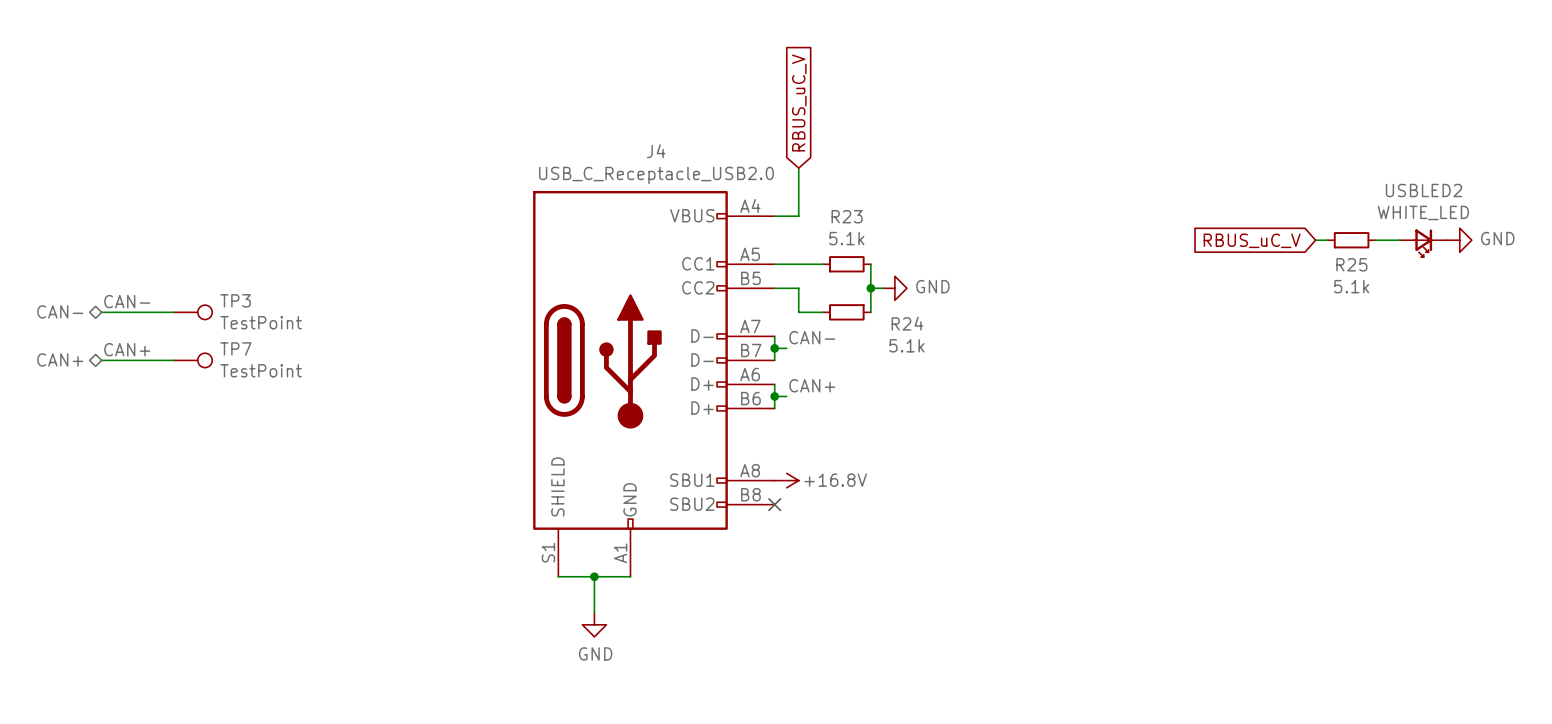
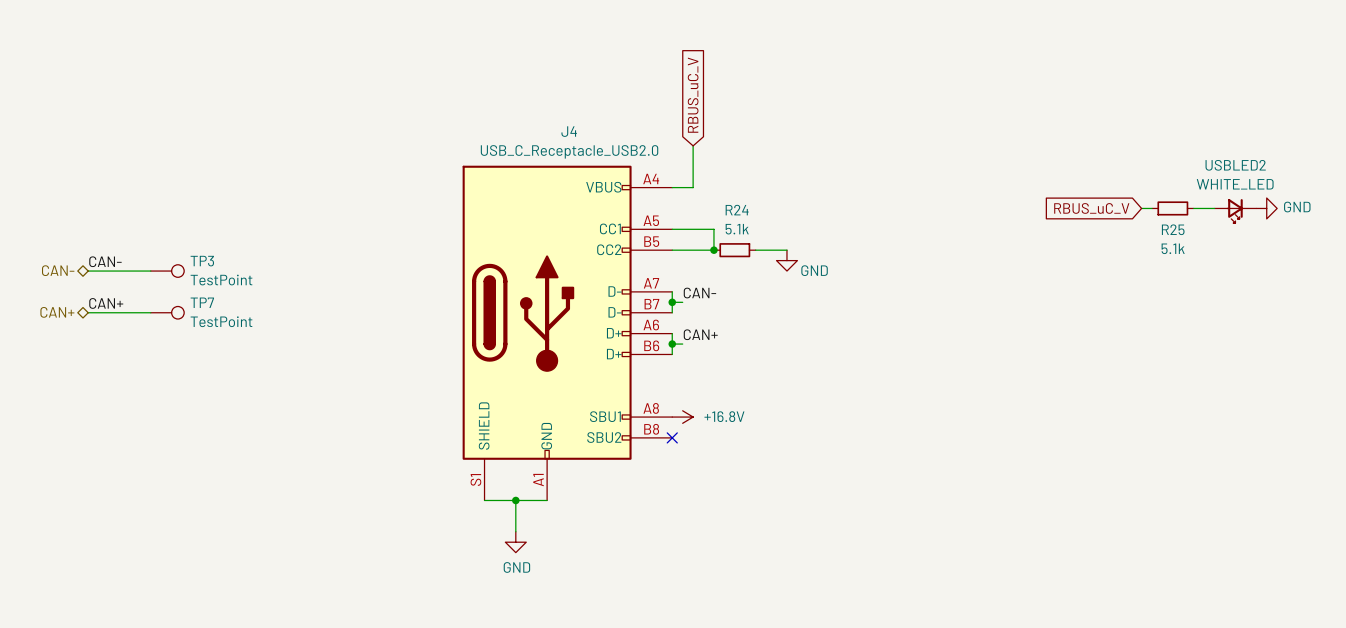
R23: 5.1k (846, 264) -> none
wire: (870, 264) (870, 312) -> none
power symbol text position: GND (932, 286) -> GND (814, 270)
wire: (798, 288) (798, 312) (822, 312) -> (693, 250) (713, 250) (713, 229)
junction position: (870, 288) -> (713, 250)
power symbol rotation: 0° (894, 288) -> 90° clockwise (786, 260)
power symbol position: GND (894, 288) -> GND (786, 260)
R24 position: (846, 312) -> (734, 250)
R24 name position: R24 (907, 323) -> R24 (737, 210)
R24 value position: 5.1k (906, 345) -> 5.1k (737, 229)

